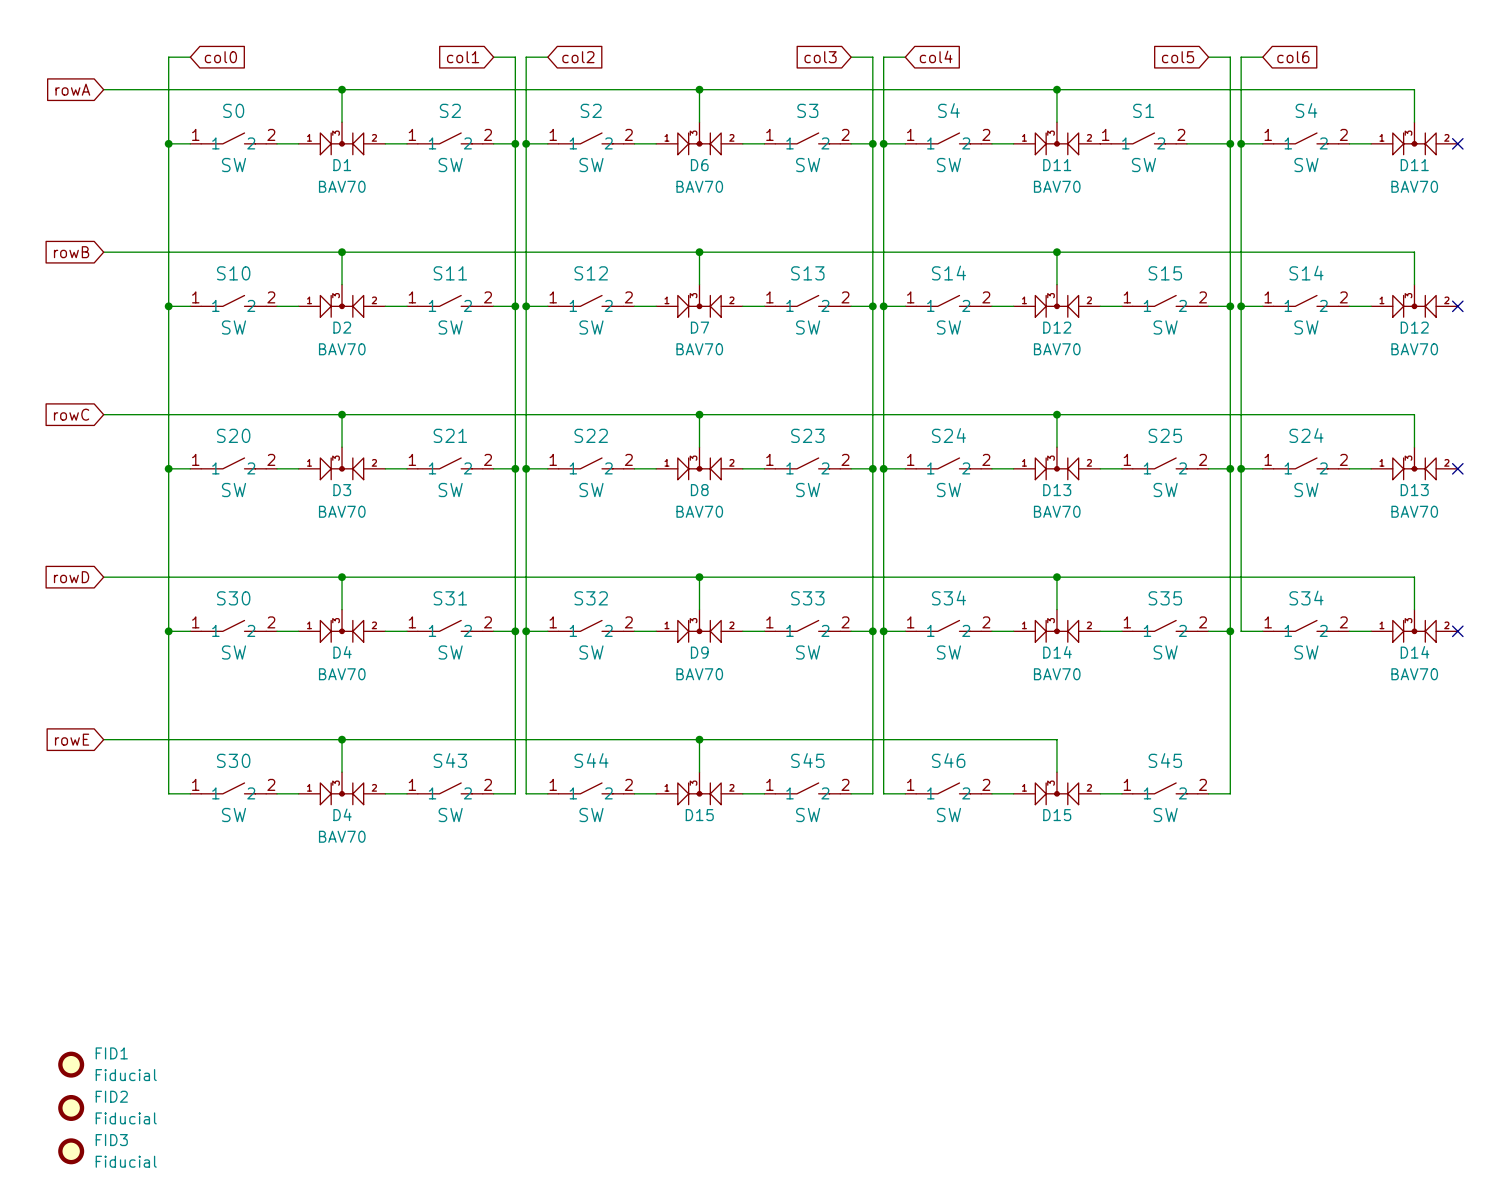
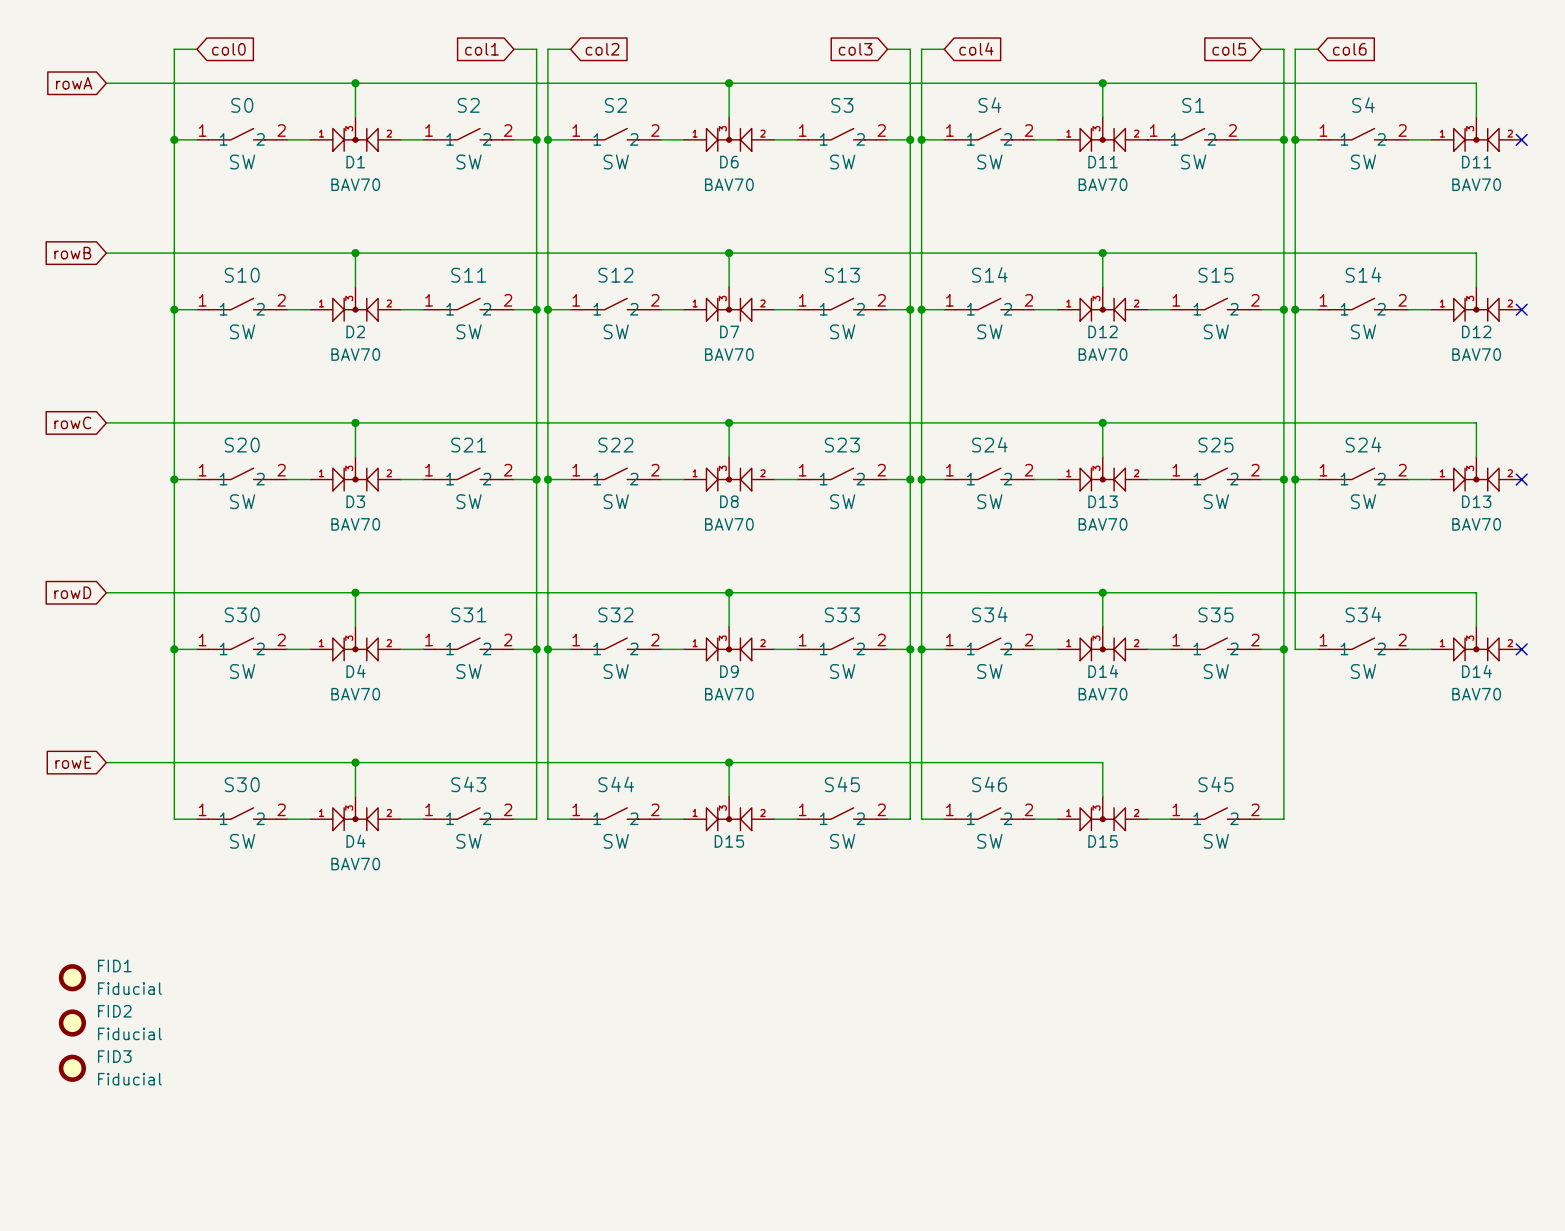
FID1 position: (71, 1064) -> (72, 977)
FID2 position: (71, 1107) -> (72, 1023)
FID3 position: (71, 1151) -> (72, 1068)

